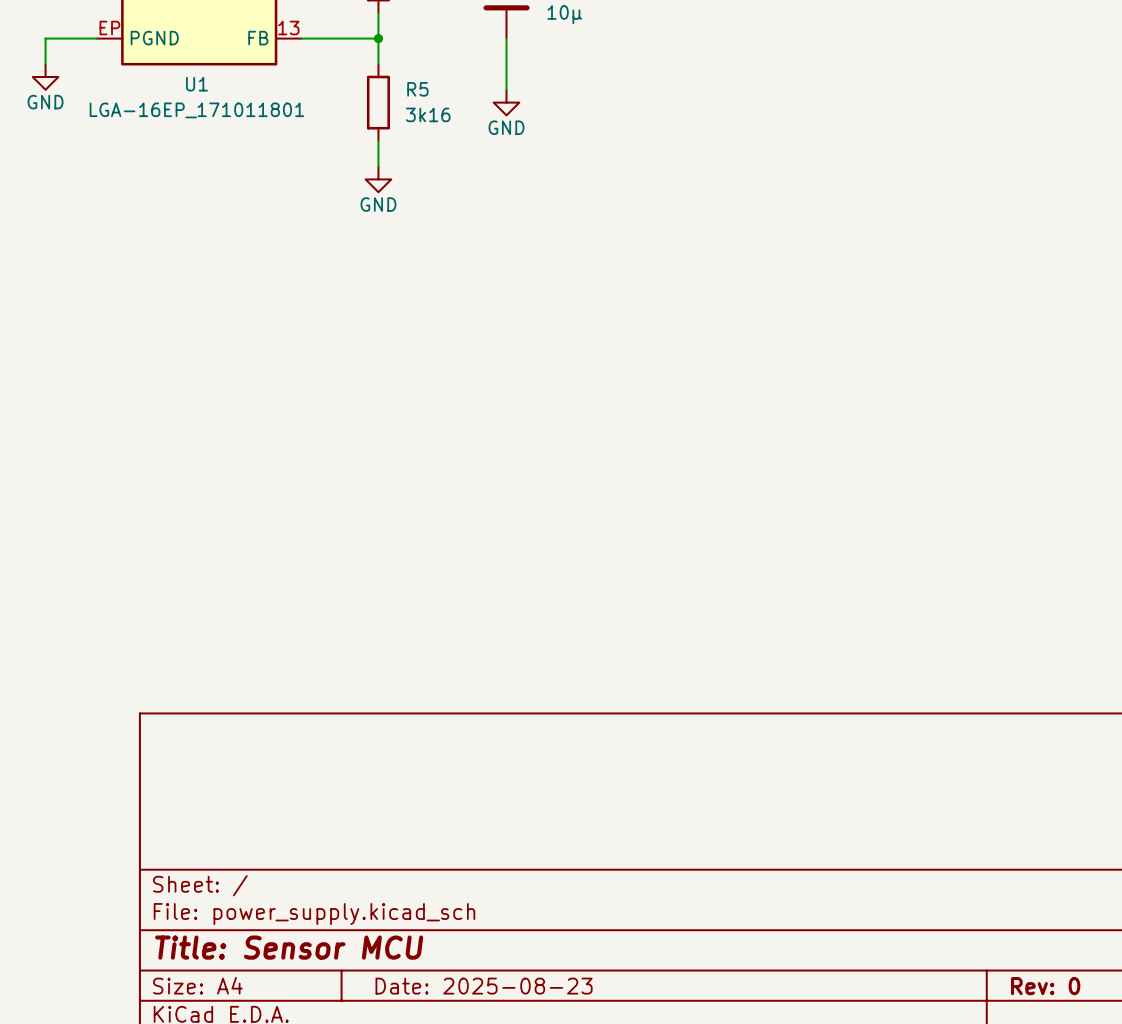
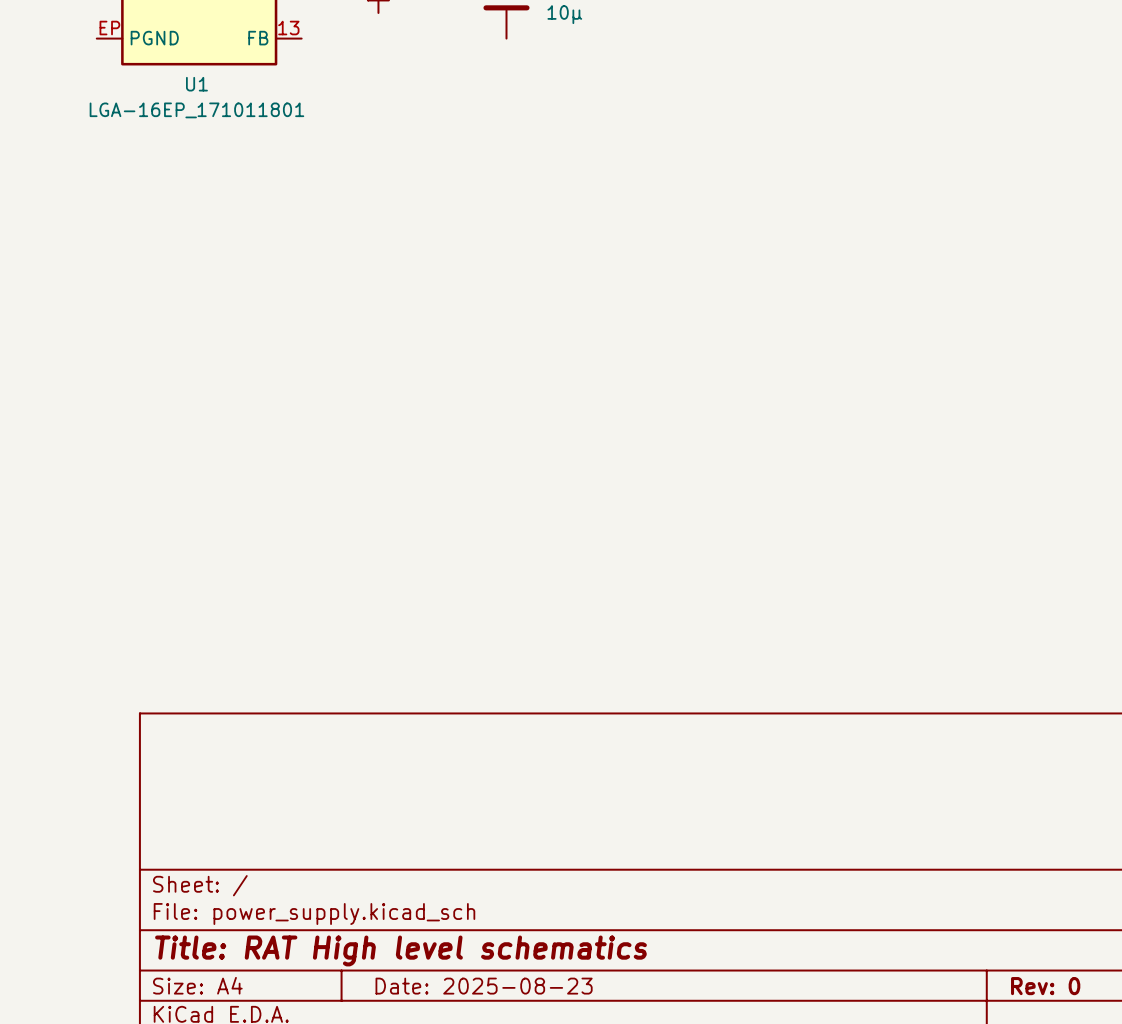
wire: (378, 12) (378, 64) -> none
wire: (96, 38) (45, 38) (45, 64) -> none
wire: (301, 38) (378, 38) -> none
junction: (378, 38) -> none
wire: (506, 38) (506, 89) -> none
power symbol: GND (45, 76) -> none
R5: 3k16 (378, 102) -> none
power symbol: GND (506, 102) -> none
wire: (378, 141) (378, 166) -> none
power symbol: GND (378, 179) -> none
title block: Title: Sensor MCU (289, 947) -> Title: RAT High level schematics (400, 950)

